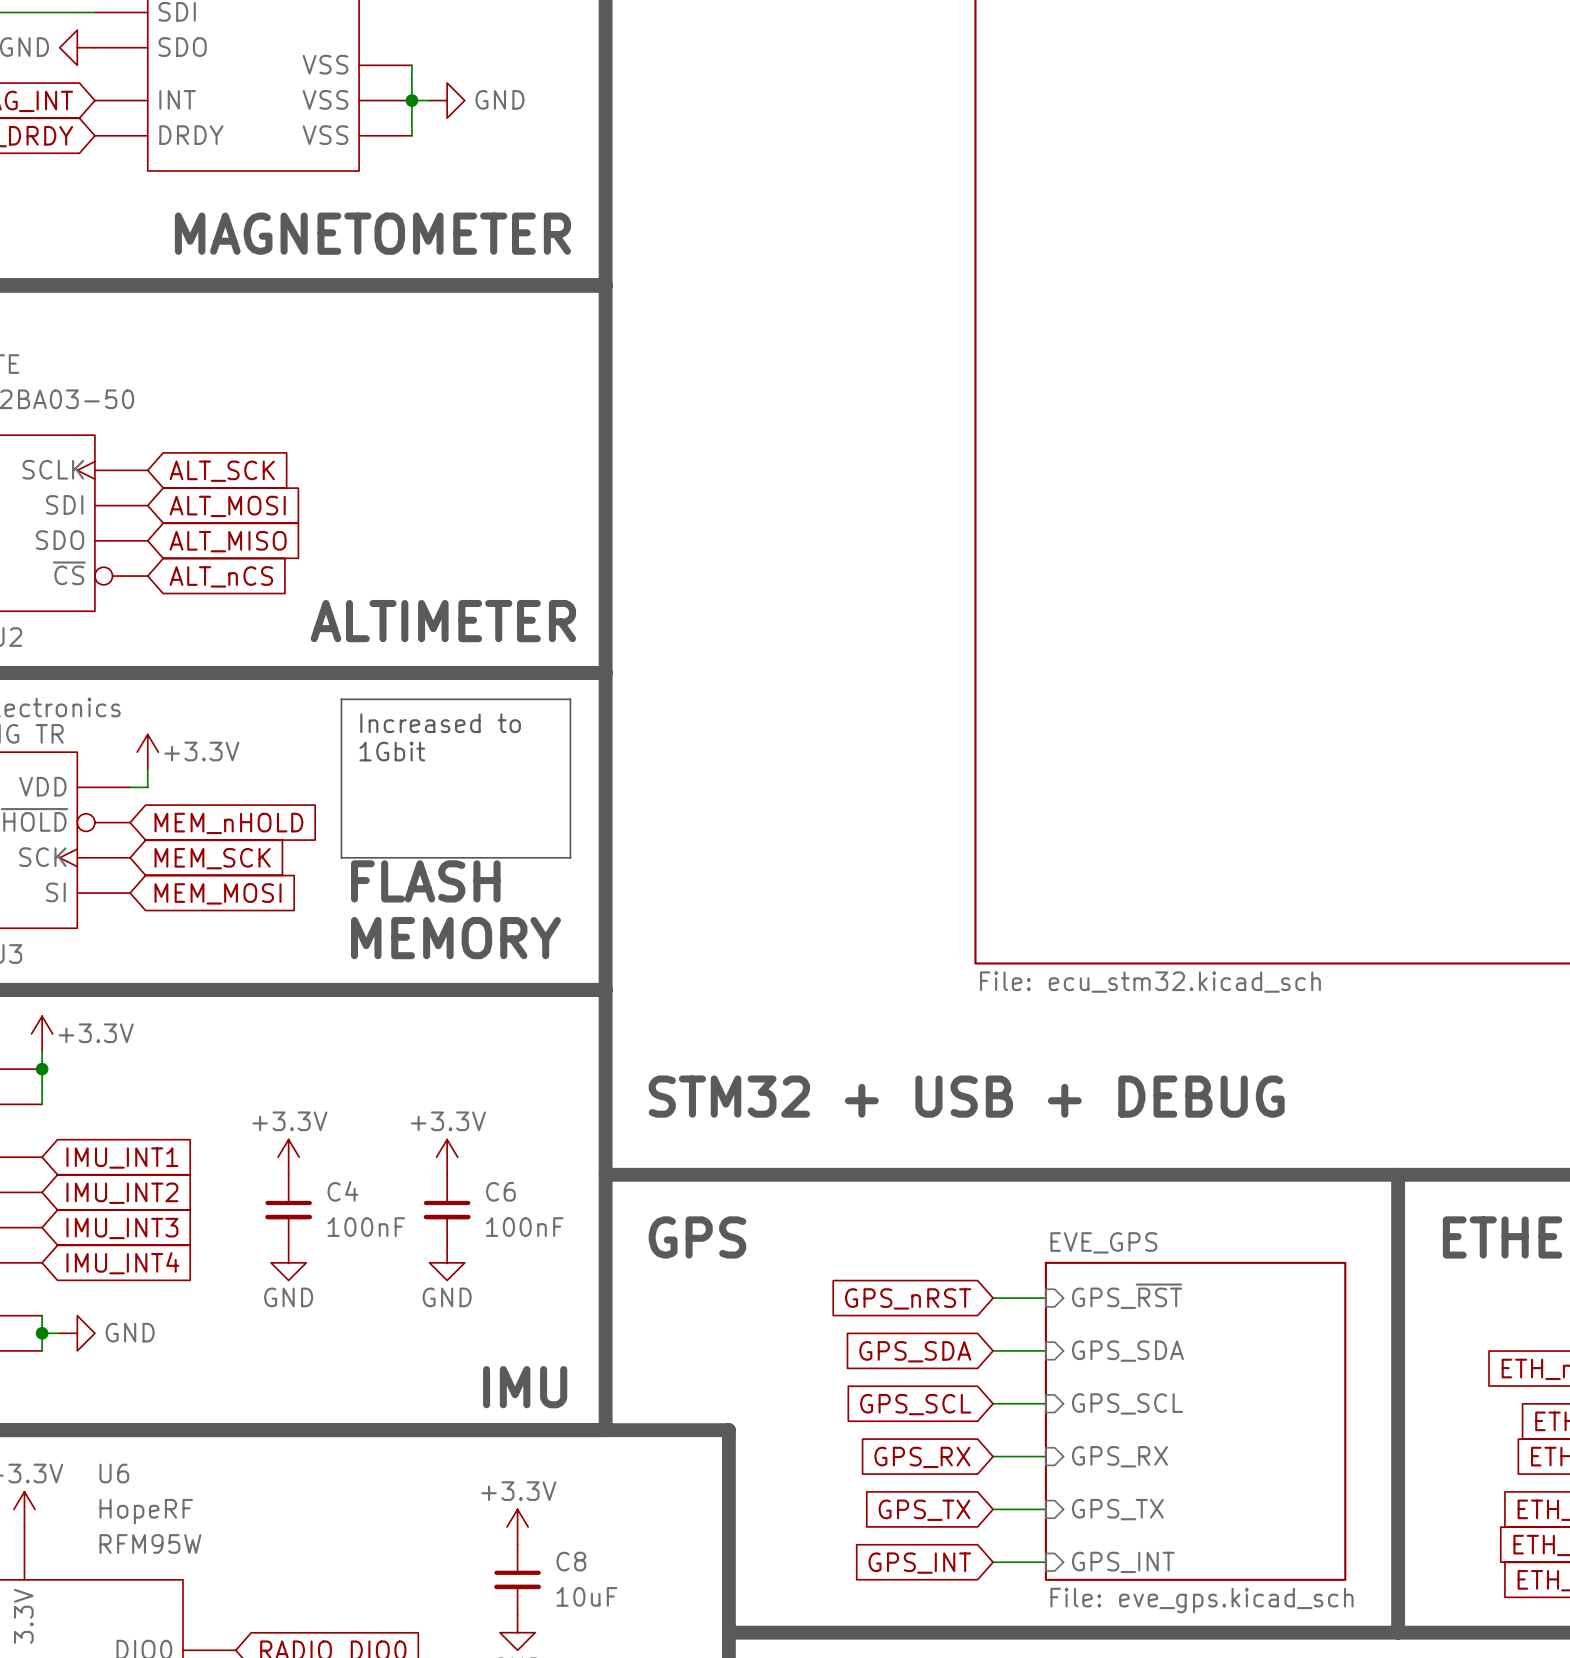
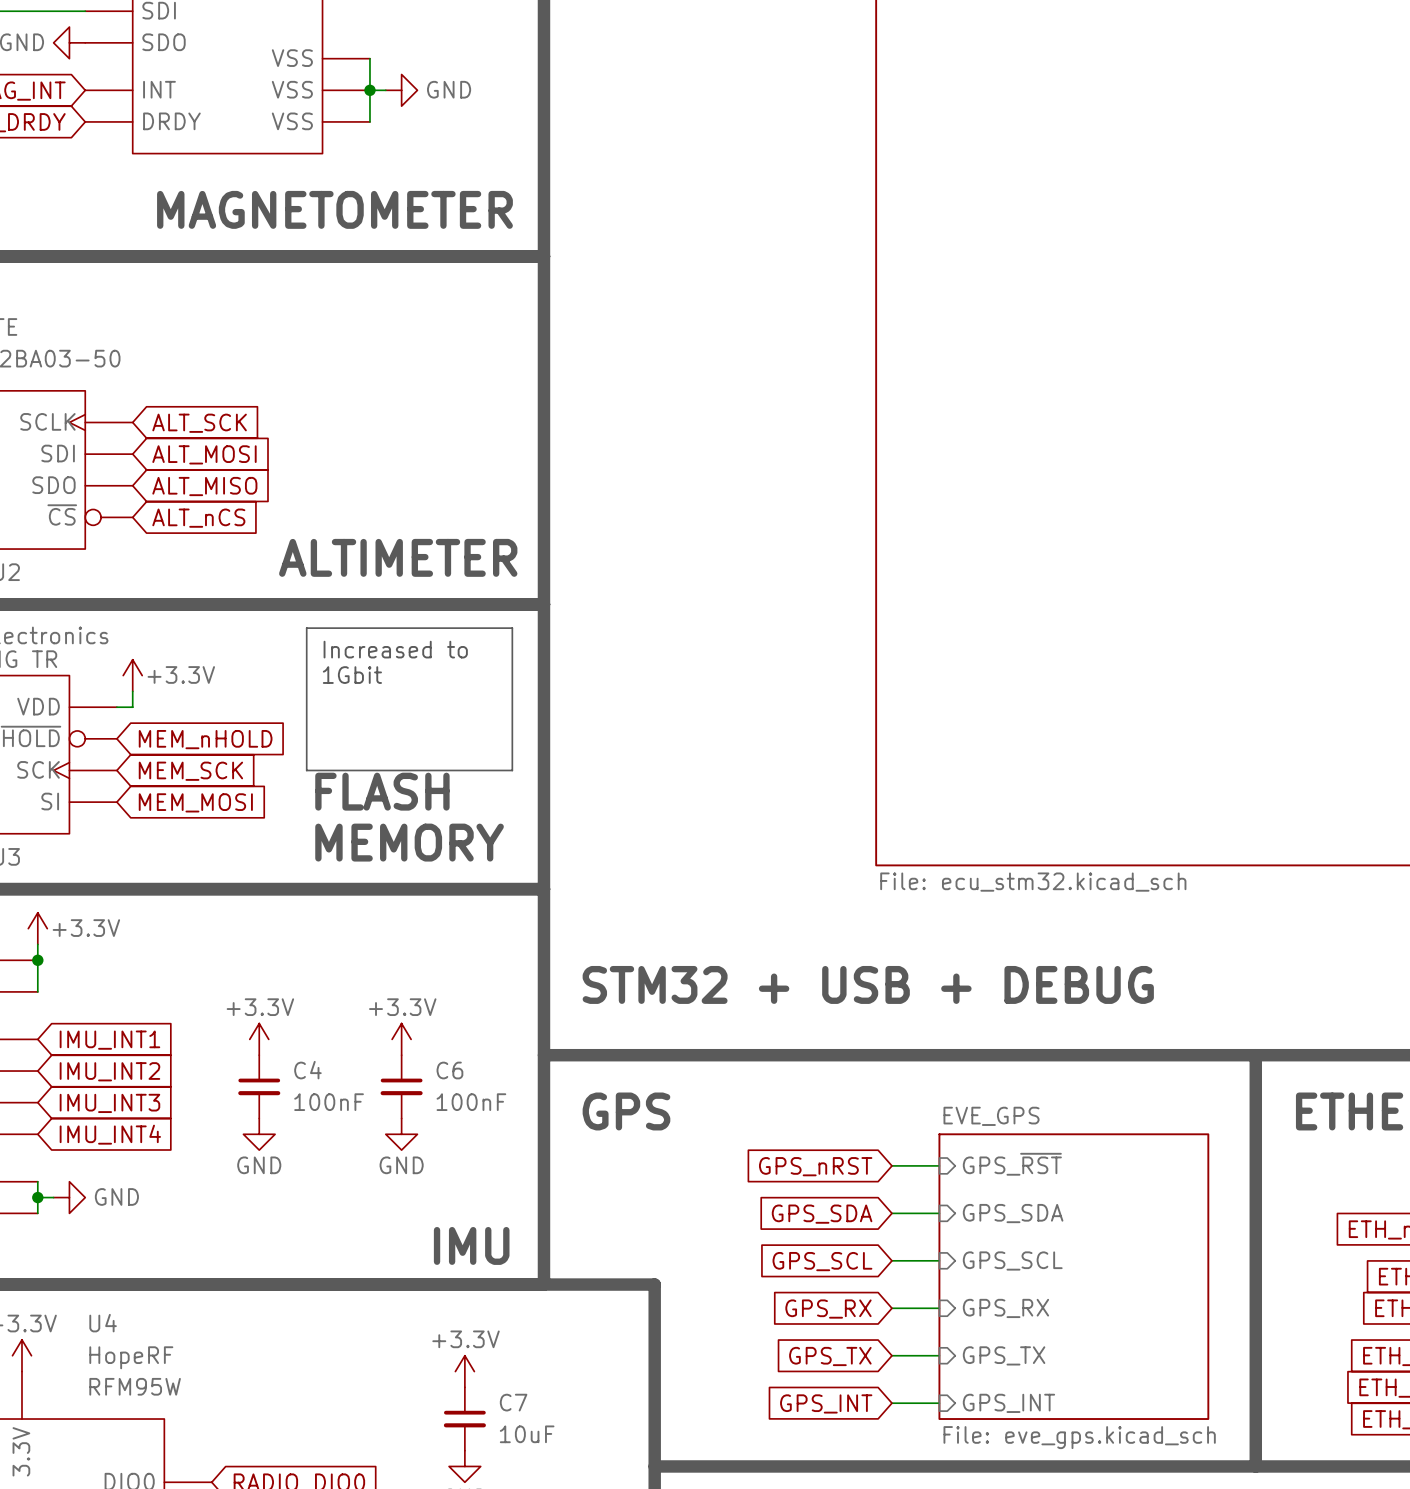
U6 name: U6 (114, 1473) -> U4 (103, 1323)
C8 name: C8 (571, 1561) -> C7 (513, 1402)

